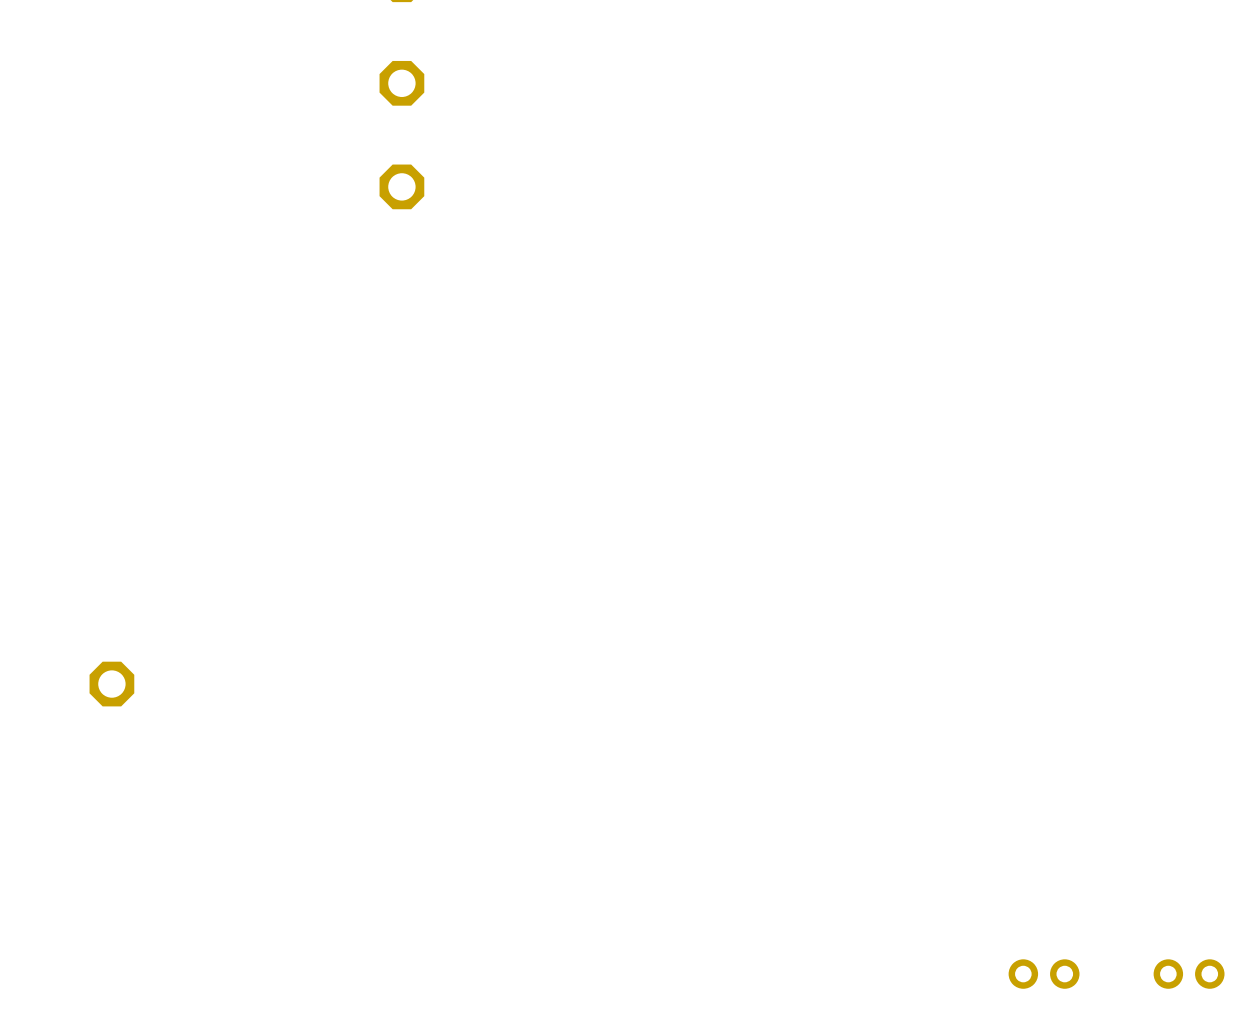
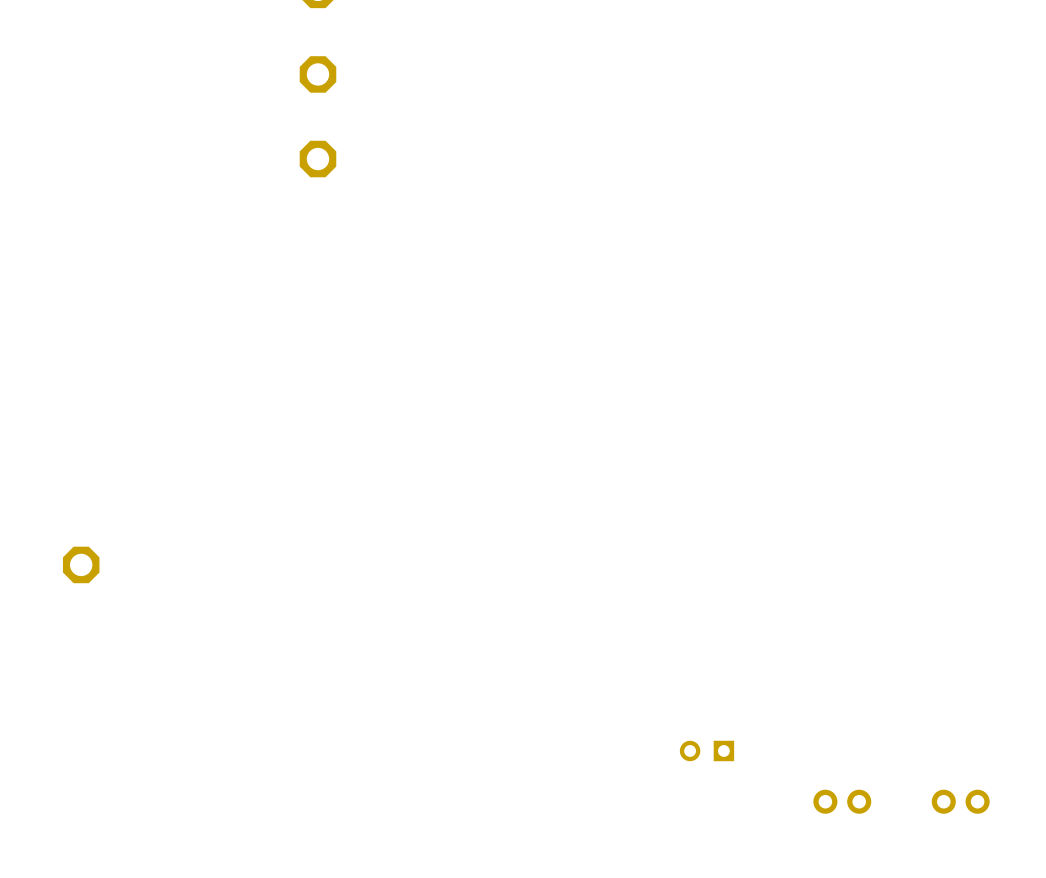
part: none -> (706, 750)

